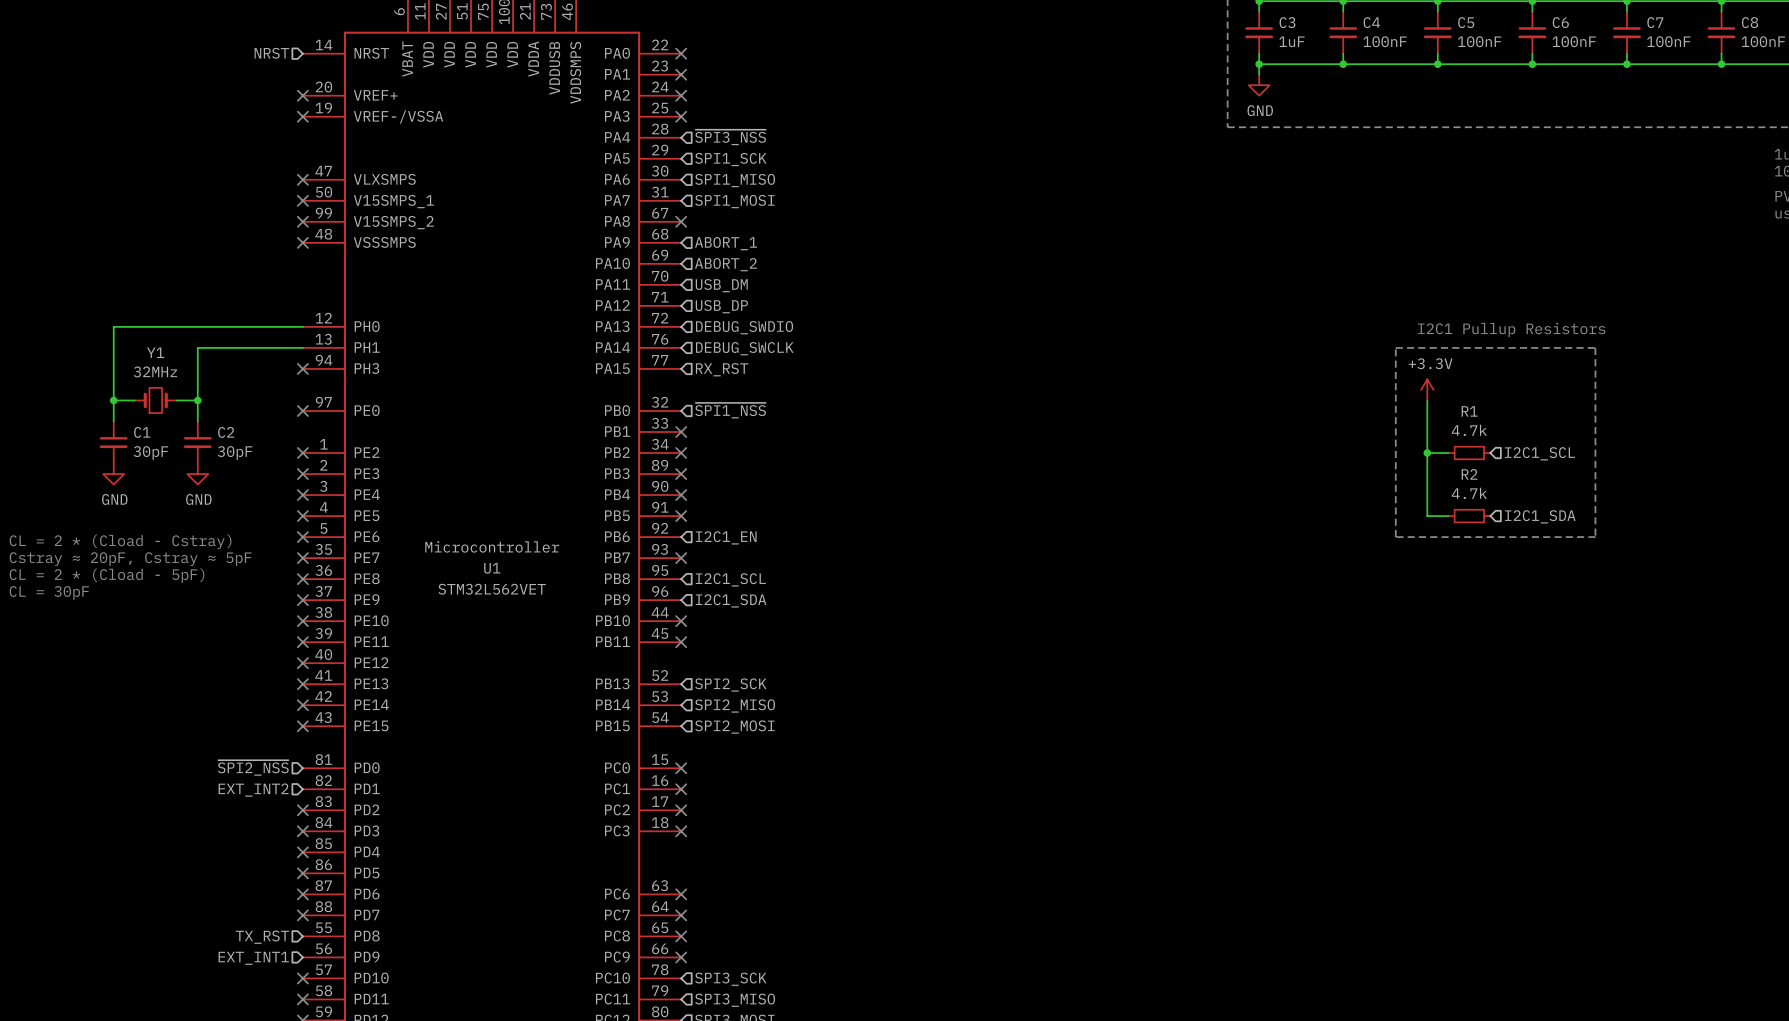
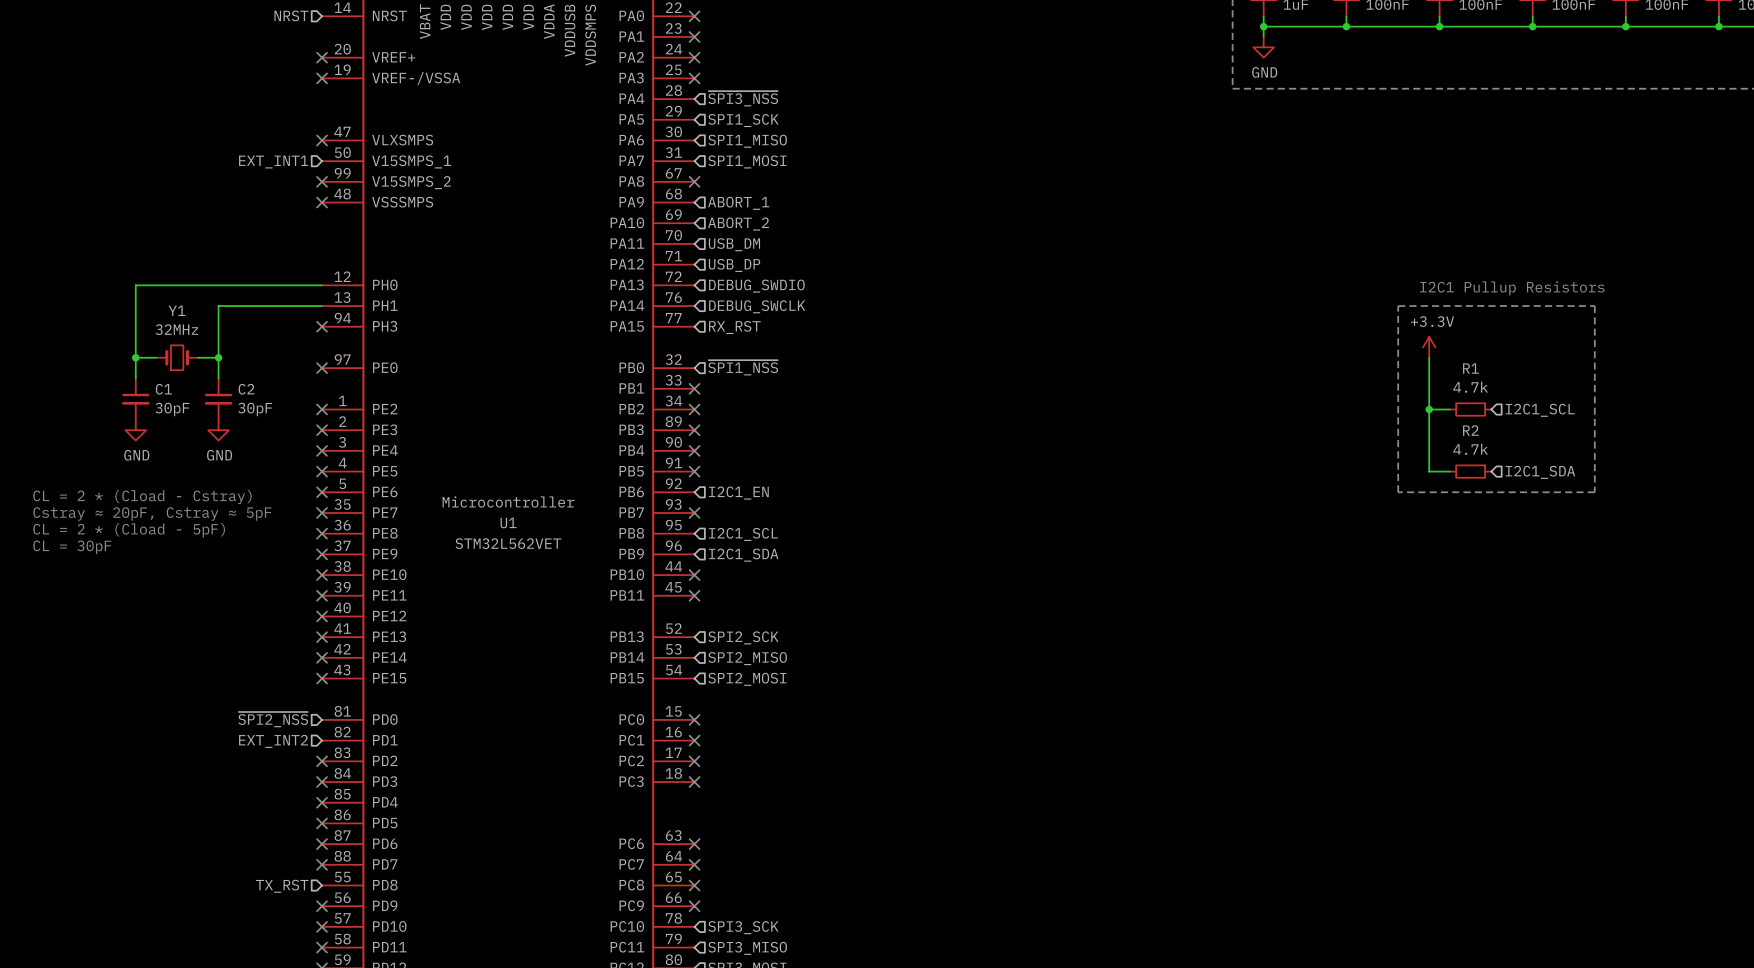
no-connect mark: (302, 200) -> none
hierarchical label: none -> EXT_INT1 (273, 162)
no-connect mark: none -> (322, 906)
hierarchical label: EXT_INT1 (253, 958) -> none

